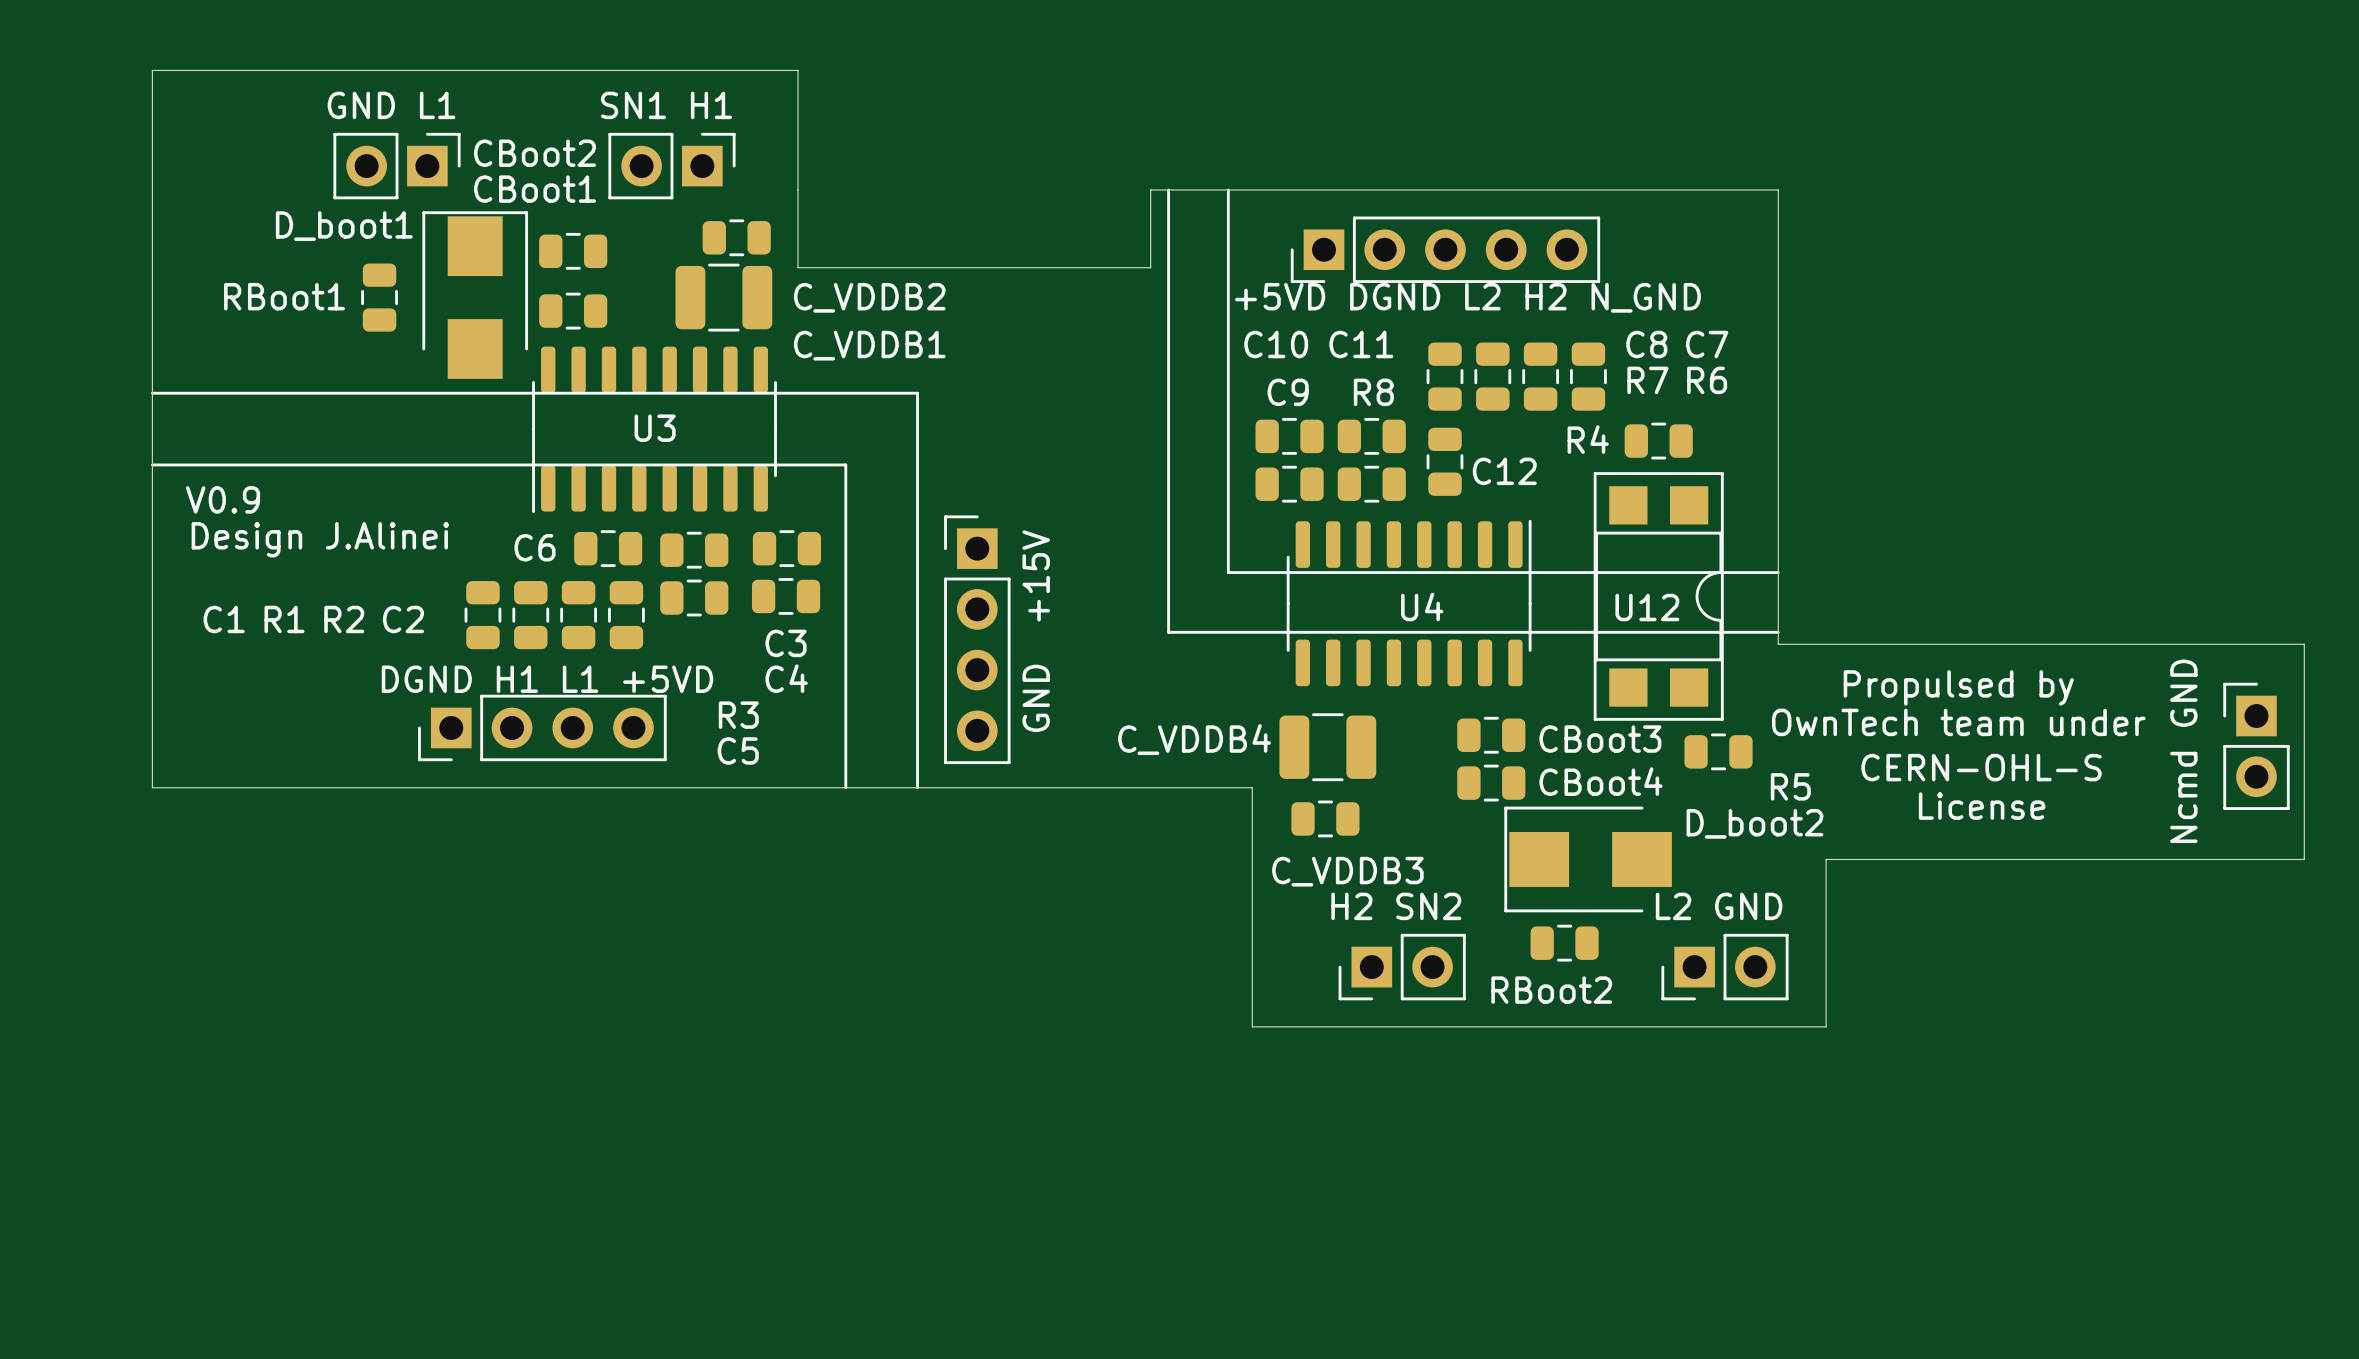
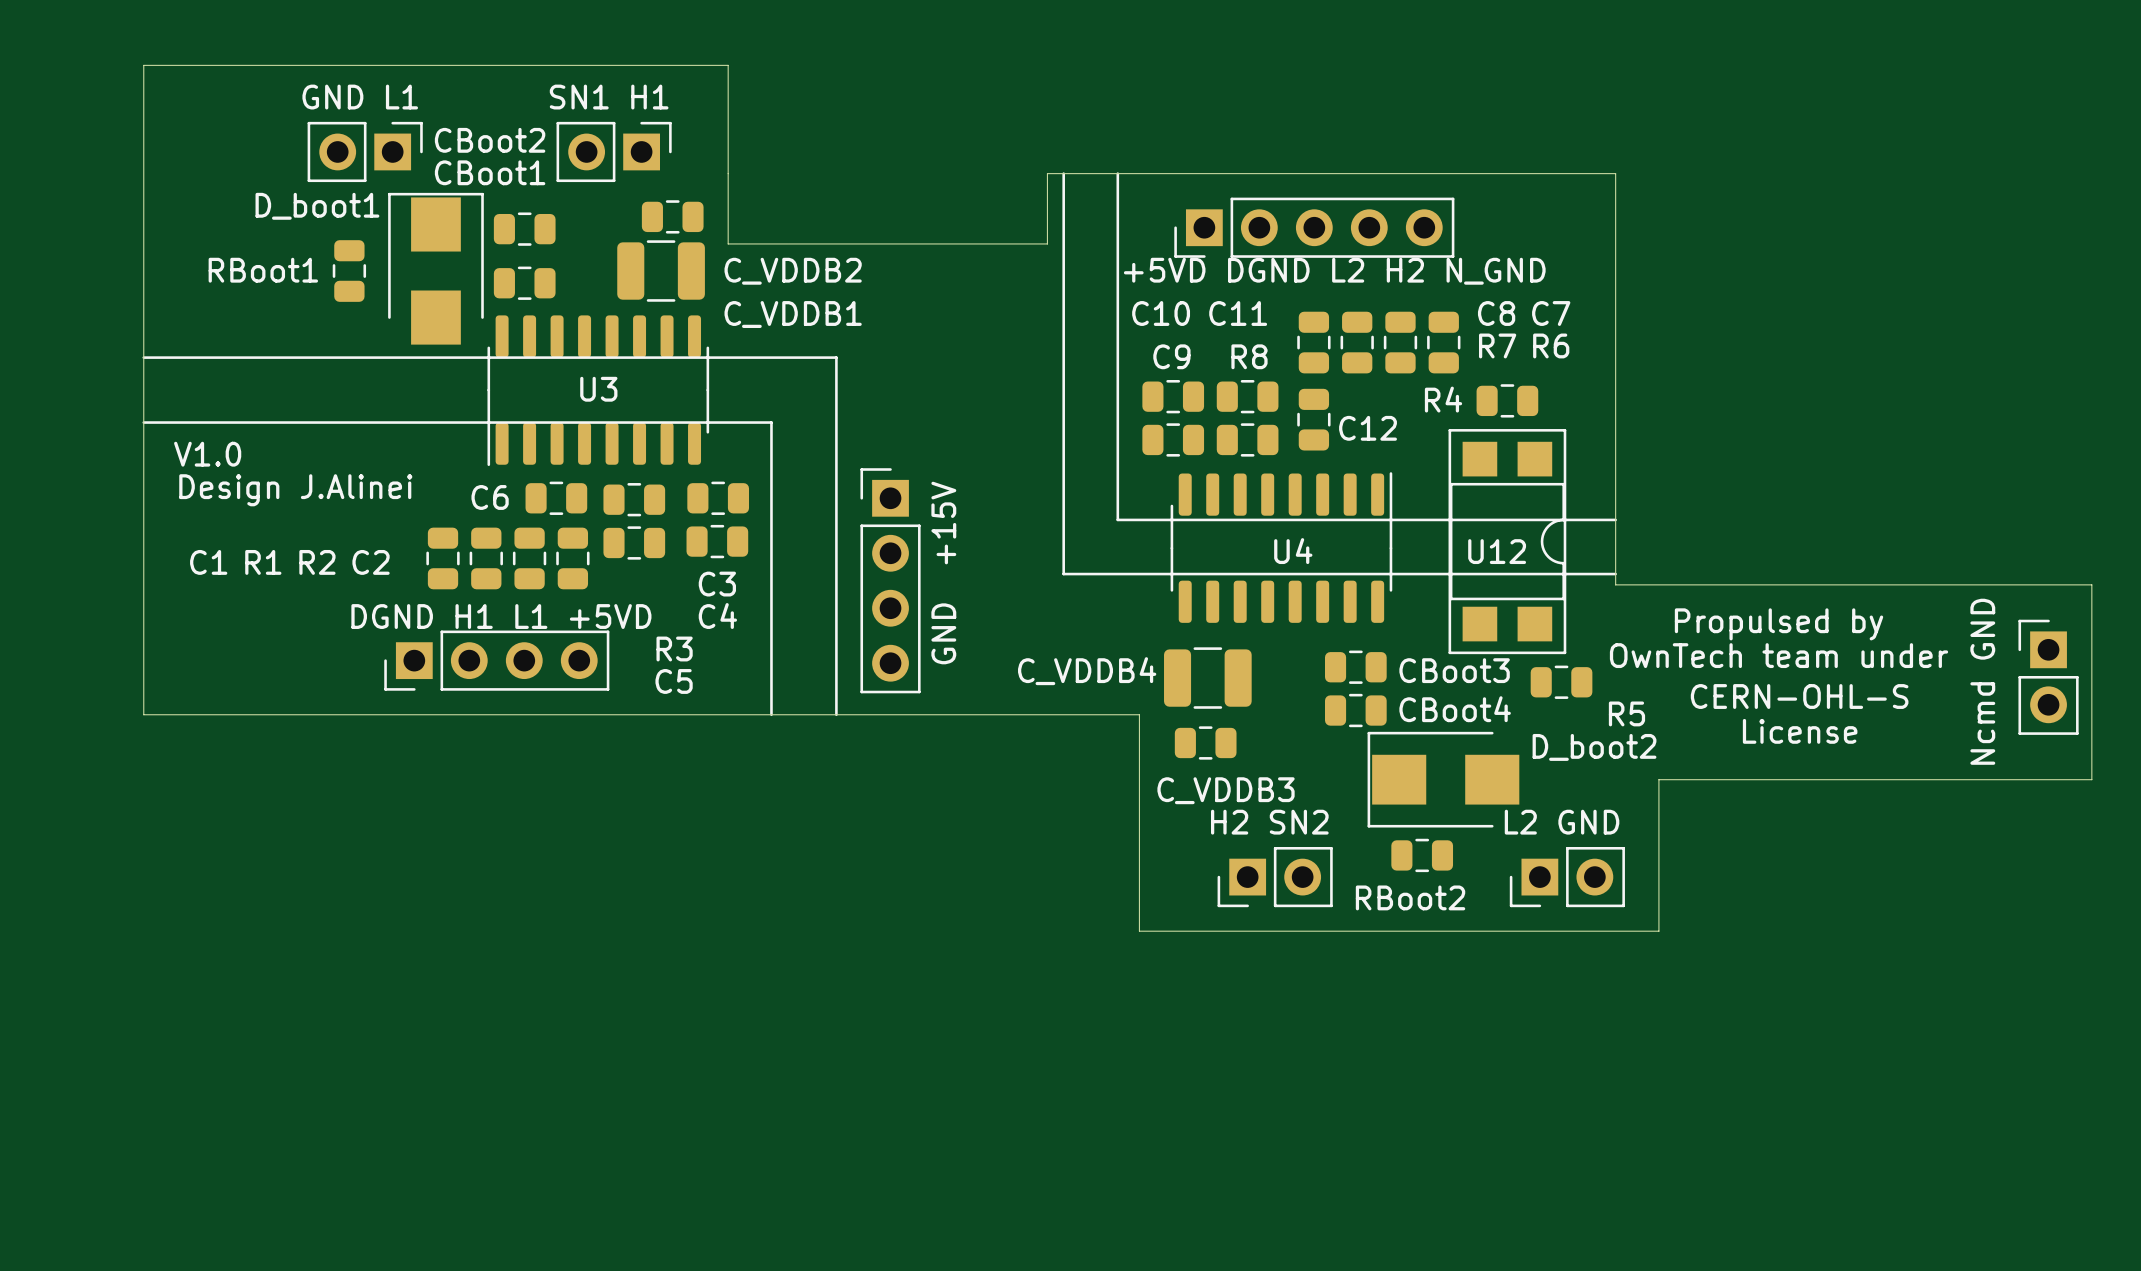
text: V0.9 (223, 499) -> V1.0 (207, 454)

